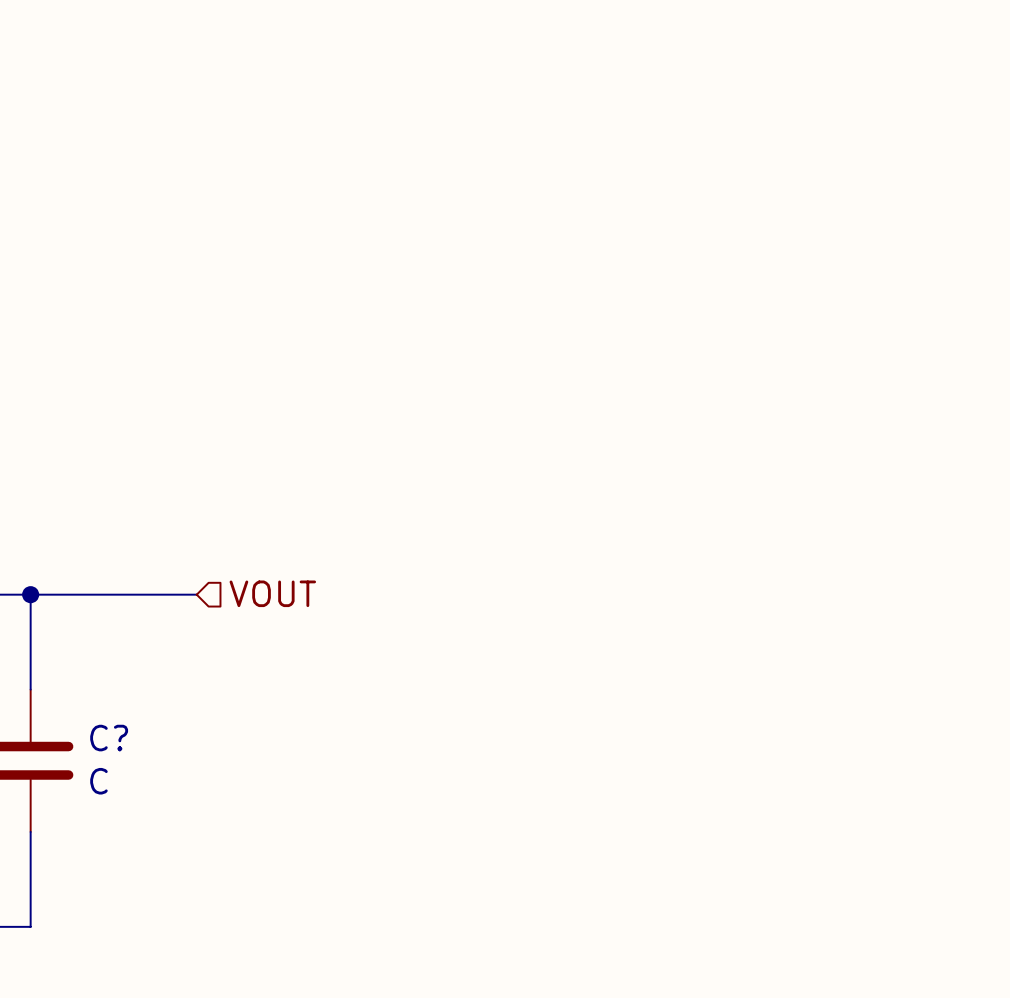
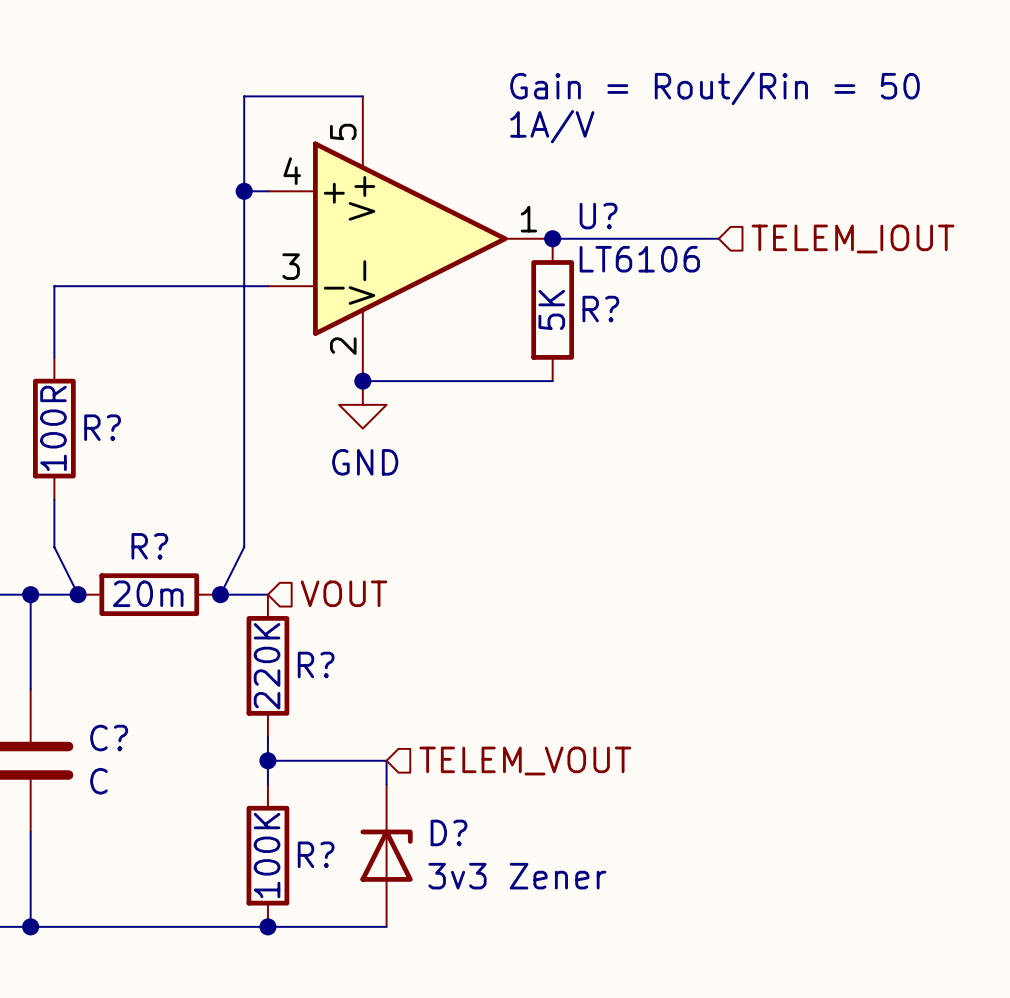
text: none -> Gain = Rout/Rin = 50 (714, 88)
wire: none -> (362, 96) (244, 96) (244, 547) (220, 594) (267, 594)
text: none -> 1A/V (552, 126)
wire: none -> (244, 191) (267, 191)
junction: none -> (244, 191)
U?: none -> LT6106 (410, 238)
wire: none -> (552, 238) (718, 238)
junction: none -> (552, 238)
hierarchical label: none -> TELEM_IOUT (853, 239)
wire: none -> (267, 286) (54, 286) (54, 357)
R?: none -> 5K (552, 309)
wire: none -> (362, 381) (552, 381)
junction: none -> (362, 381)
power symbol: none -> GND (362, 404)
R?: none -> 100R (54, 428)
hierarchical label position: VOUT (272, 593) -> VOUT (344, 593)
wire: (78, 594) (196, 594) -> (78, 594) (54, 547) (54, 499)
junction: none -> (78, 594)
R?: none -> 20m (149, 594)
junction: none -> (220, 594)
R?: none -> 220K (267, 665)
wire: none -> (267, 737) (267, 784)
wire: none -> (267, 760) (386, 760) (386, 784)
junction: none -> (267, 760)
hierarchical label: none -> TELEM_VOUT (525, 761)
R?: none -> 100K (267, 855)
D?: none -> 3v3 Zener (386, 855)
wire: none -> (30, 926) (386, 926)
junction: none -> (30, 926)
junction: none -> (267, 926)

